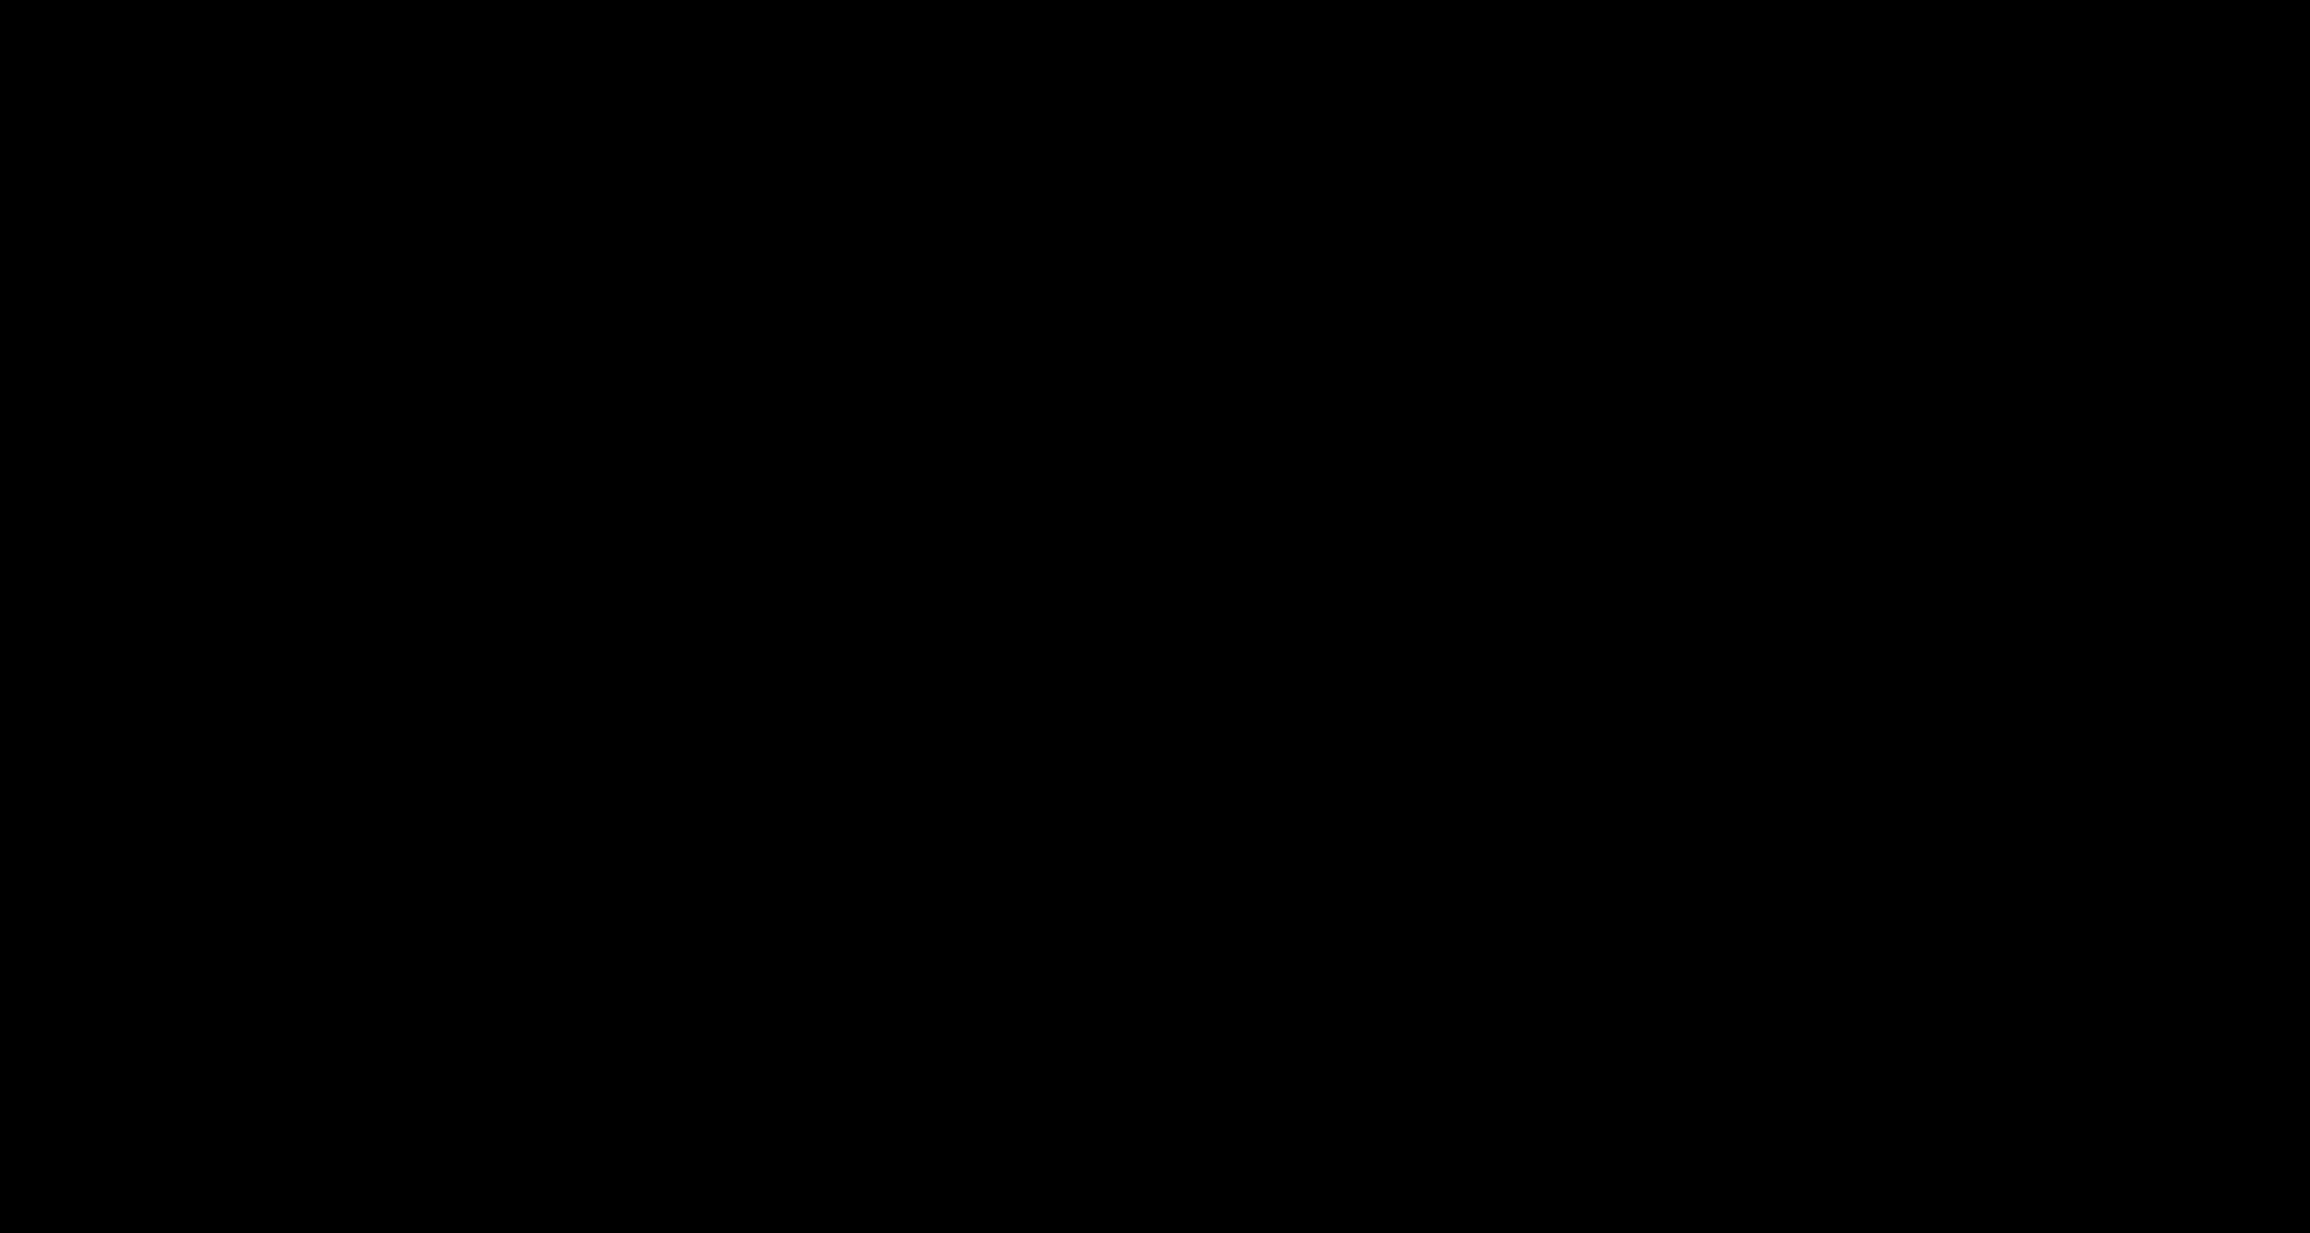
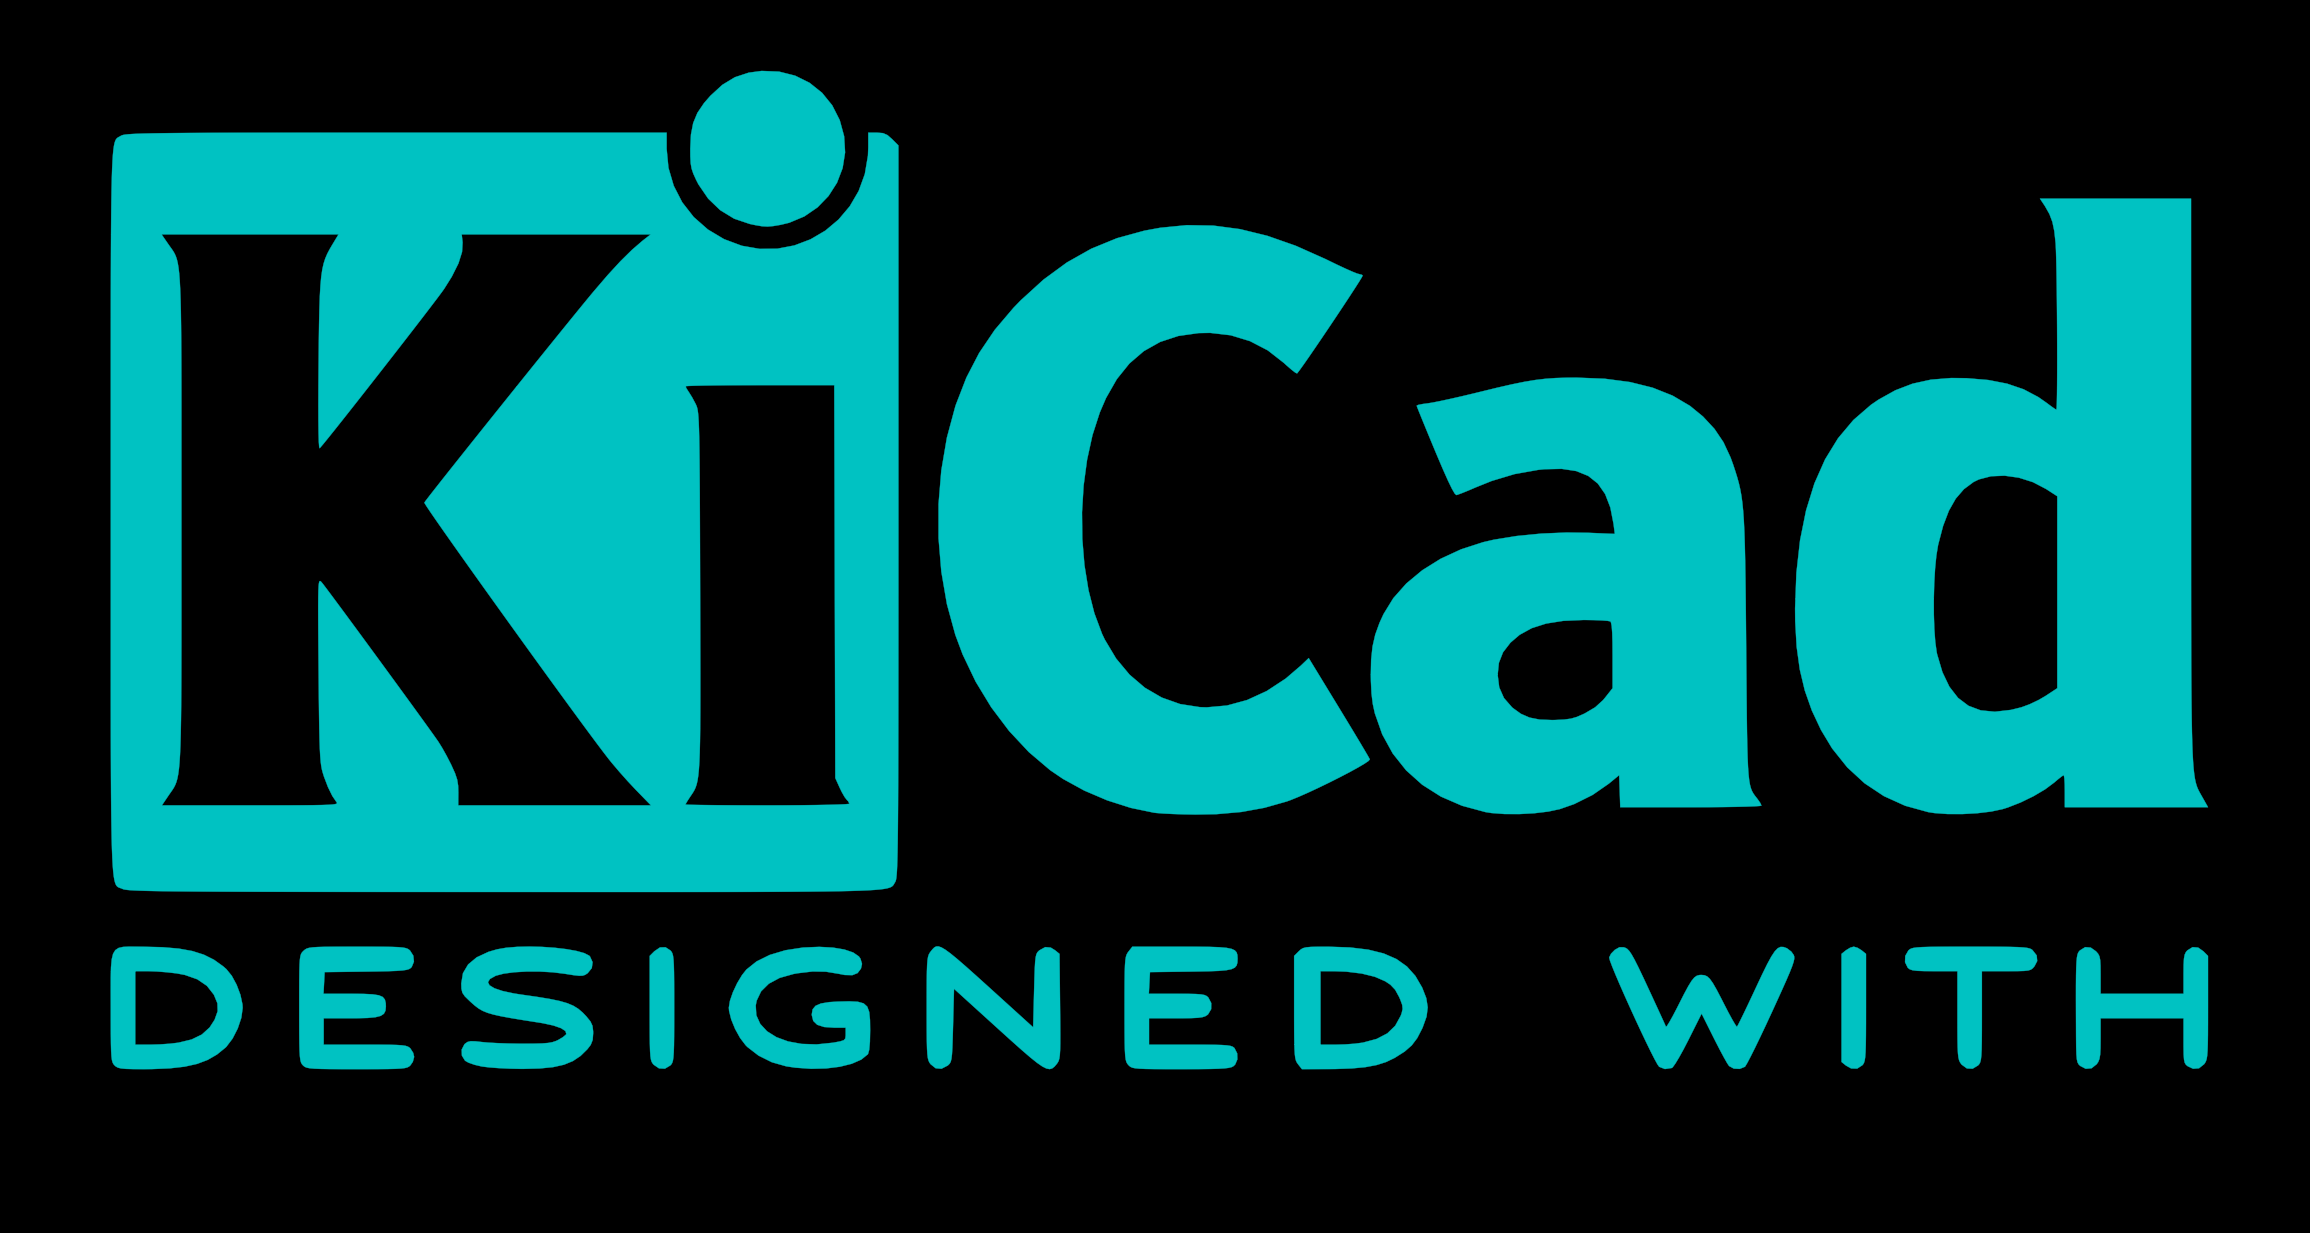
drawing: none -> [110, 70, 2209, 1070]

